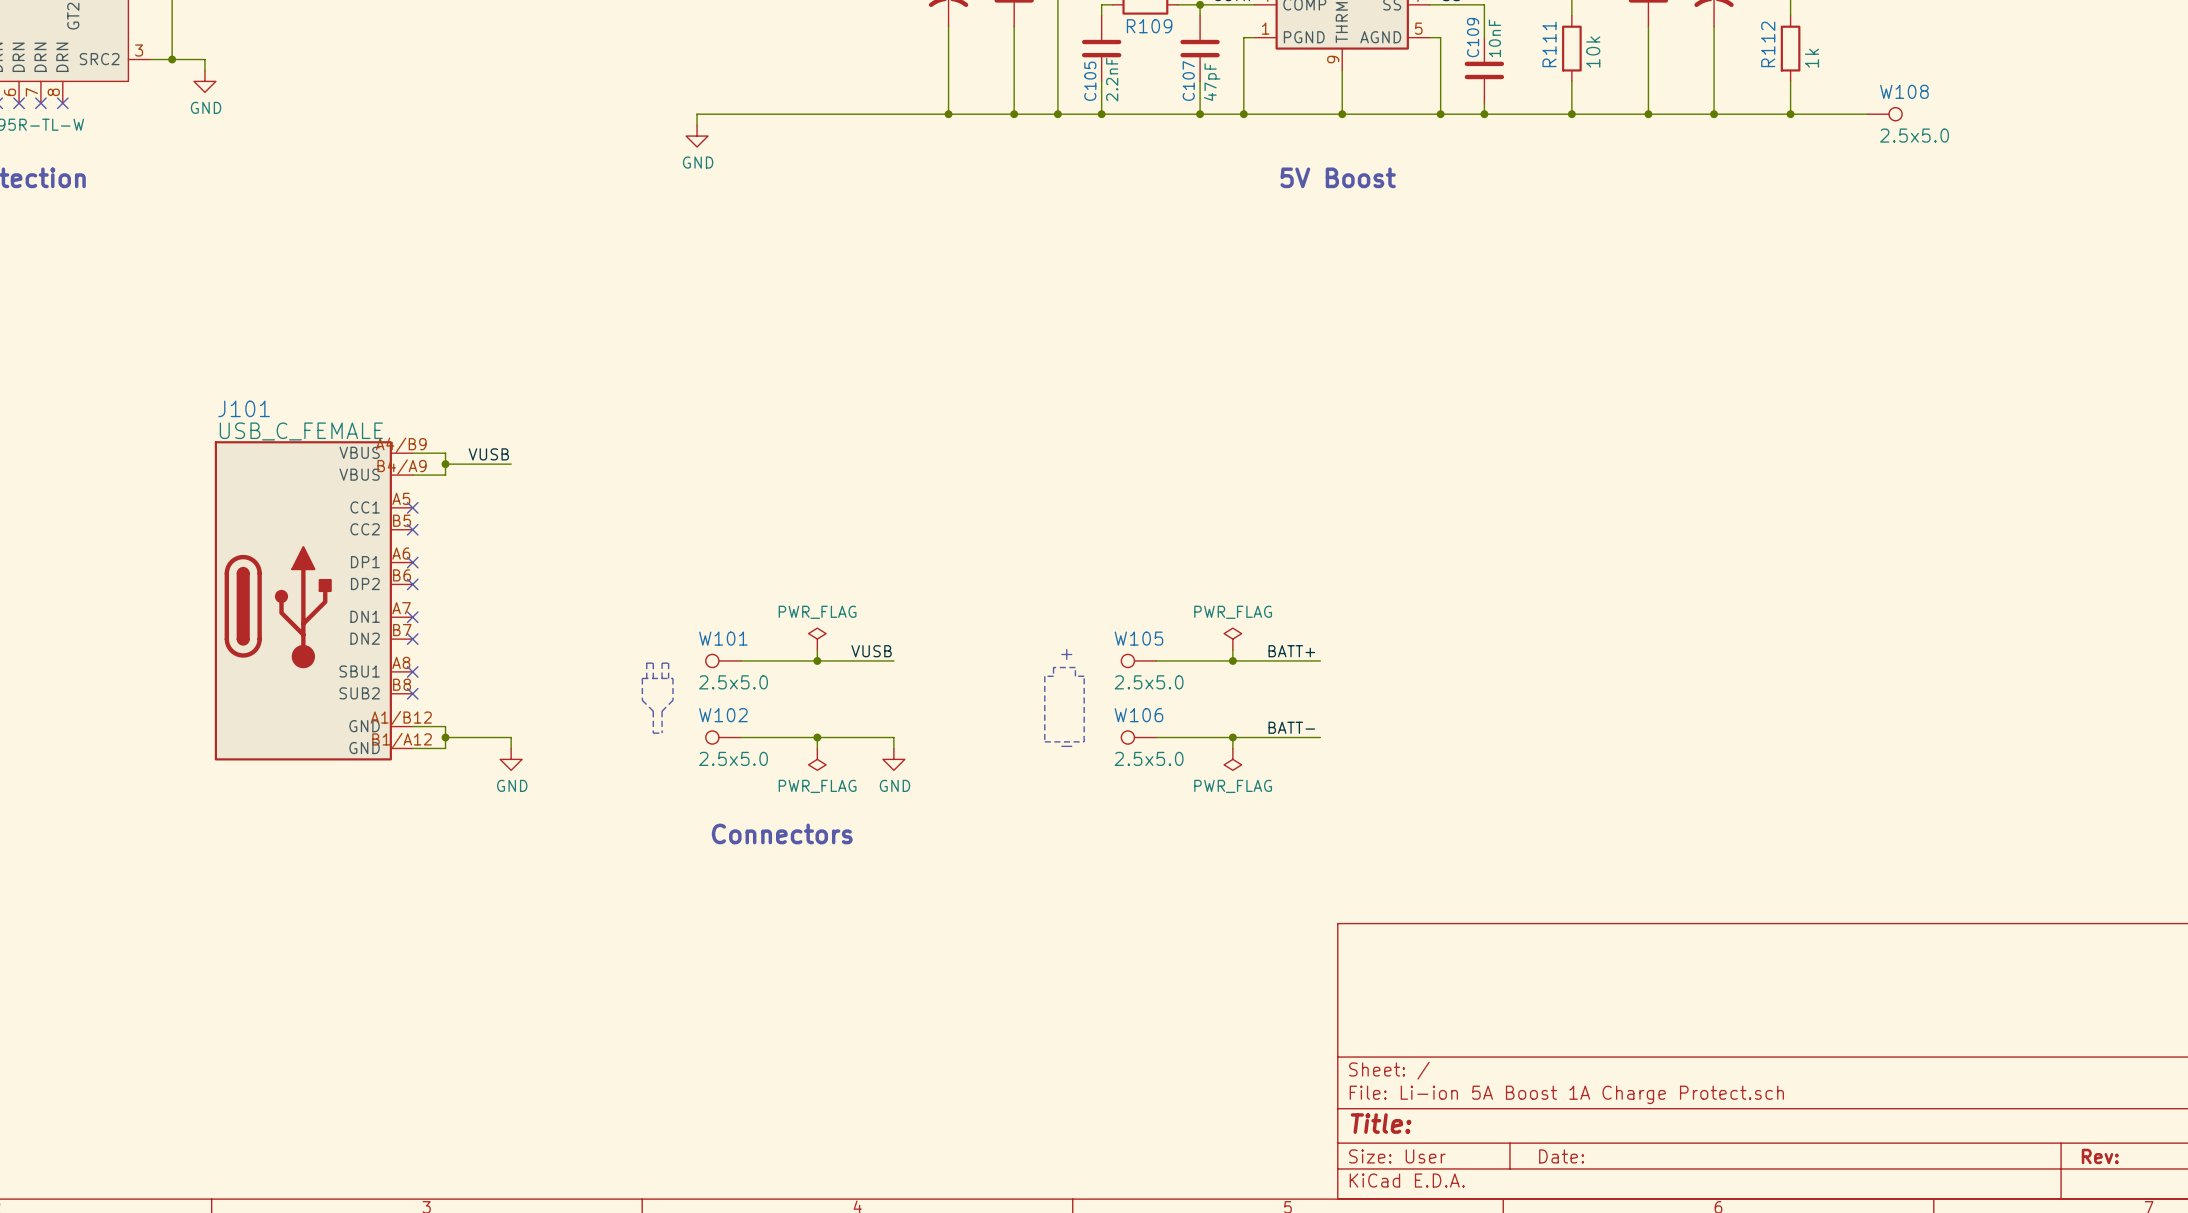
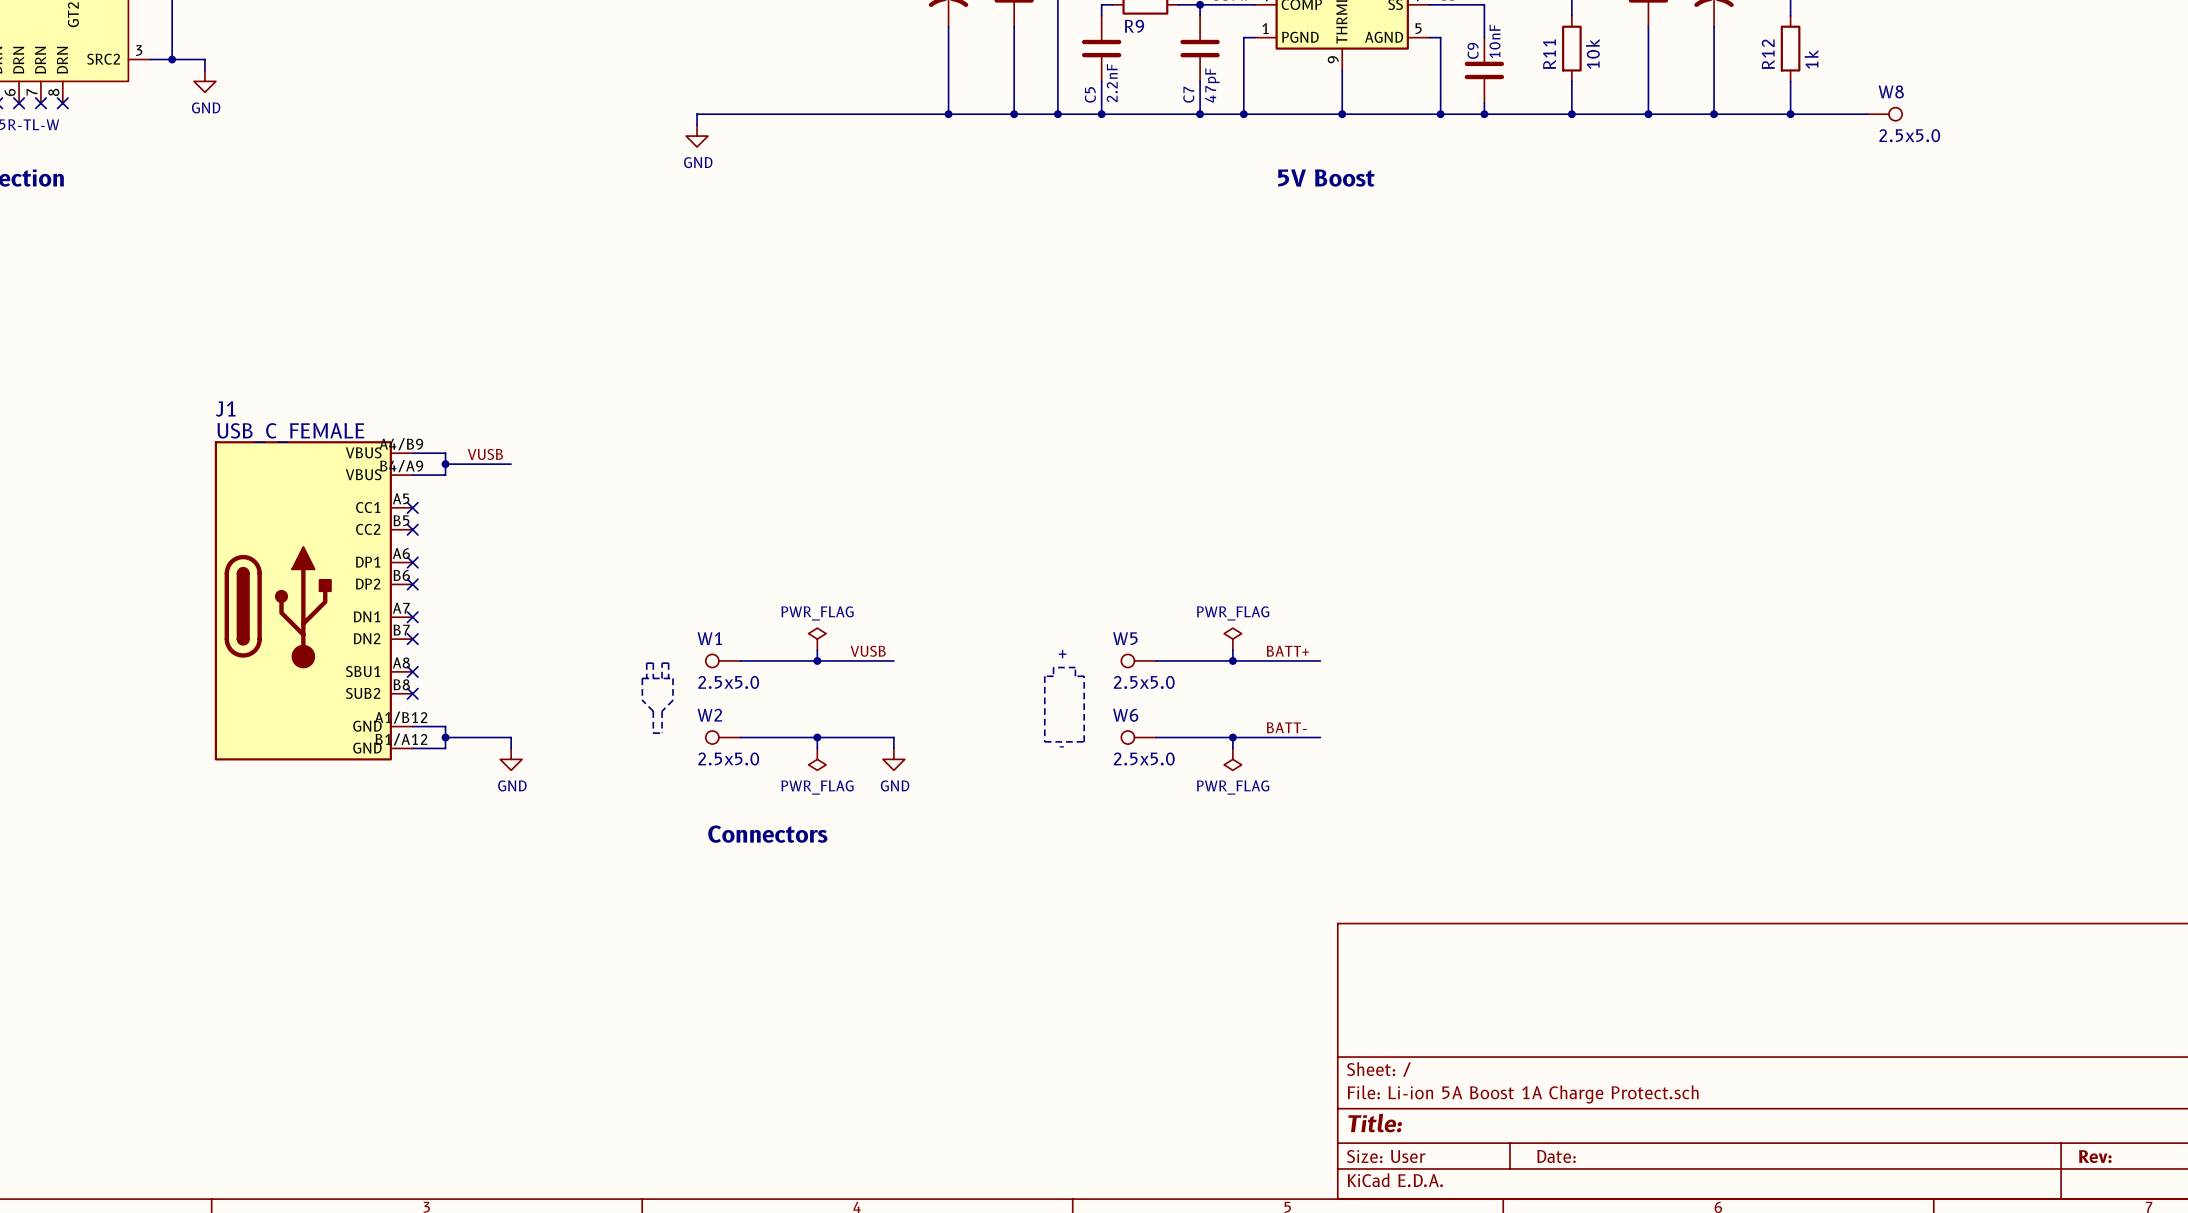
R109 name: R109 (1149, 26) -> R9 (1134, 26)
C109 name: C109 (1473, 37) -> C9 (1473, 50)
R111 name: R111 (1549, 44) -> R11 (1549, 54)
R112 name: R112 (1768, 44) -> R12 (1768, 54)
C105 name: C105 (1090, 81) -> C5 (1090, 94)
C107 name: C107 (1188, 81) -> C7 (1188, 94)
W108 name: W108 (1904, 91) -> W8 (1891, 91)
J101 name: J101 (244, 408) -> J1 (225, 408)
W101 name: W101 (723, 638) -> W1 (709, 638)
W105 name: W105 (1138, 638) -> W5 (1125, 638)
W102 name: W102 (723, 715) -> W2 (709, 715)
W106 name: W106 (1138, 715) -> W6 (1125, 715)

